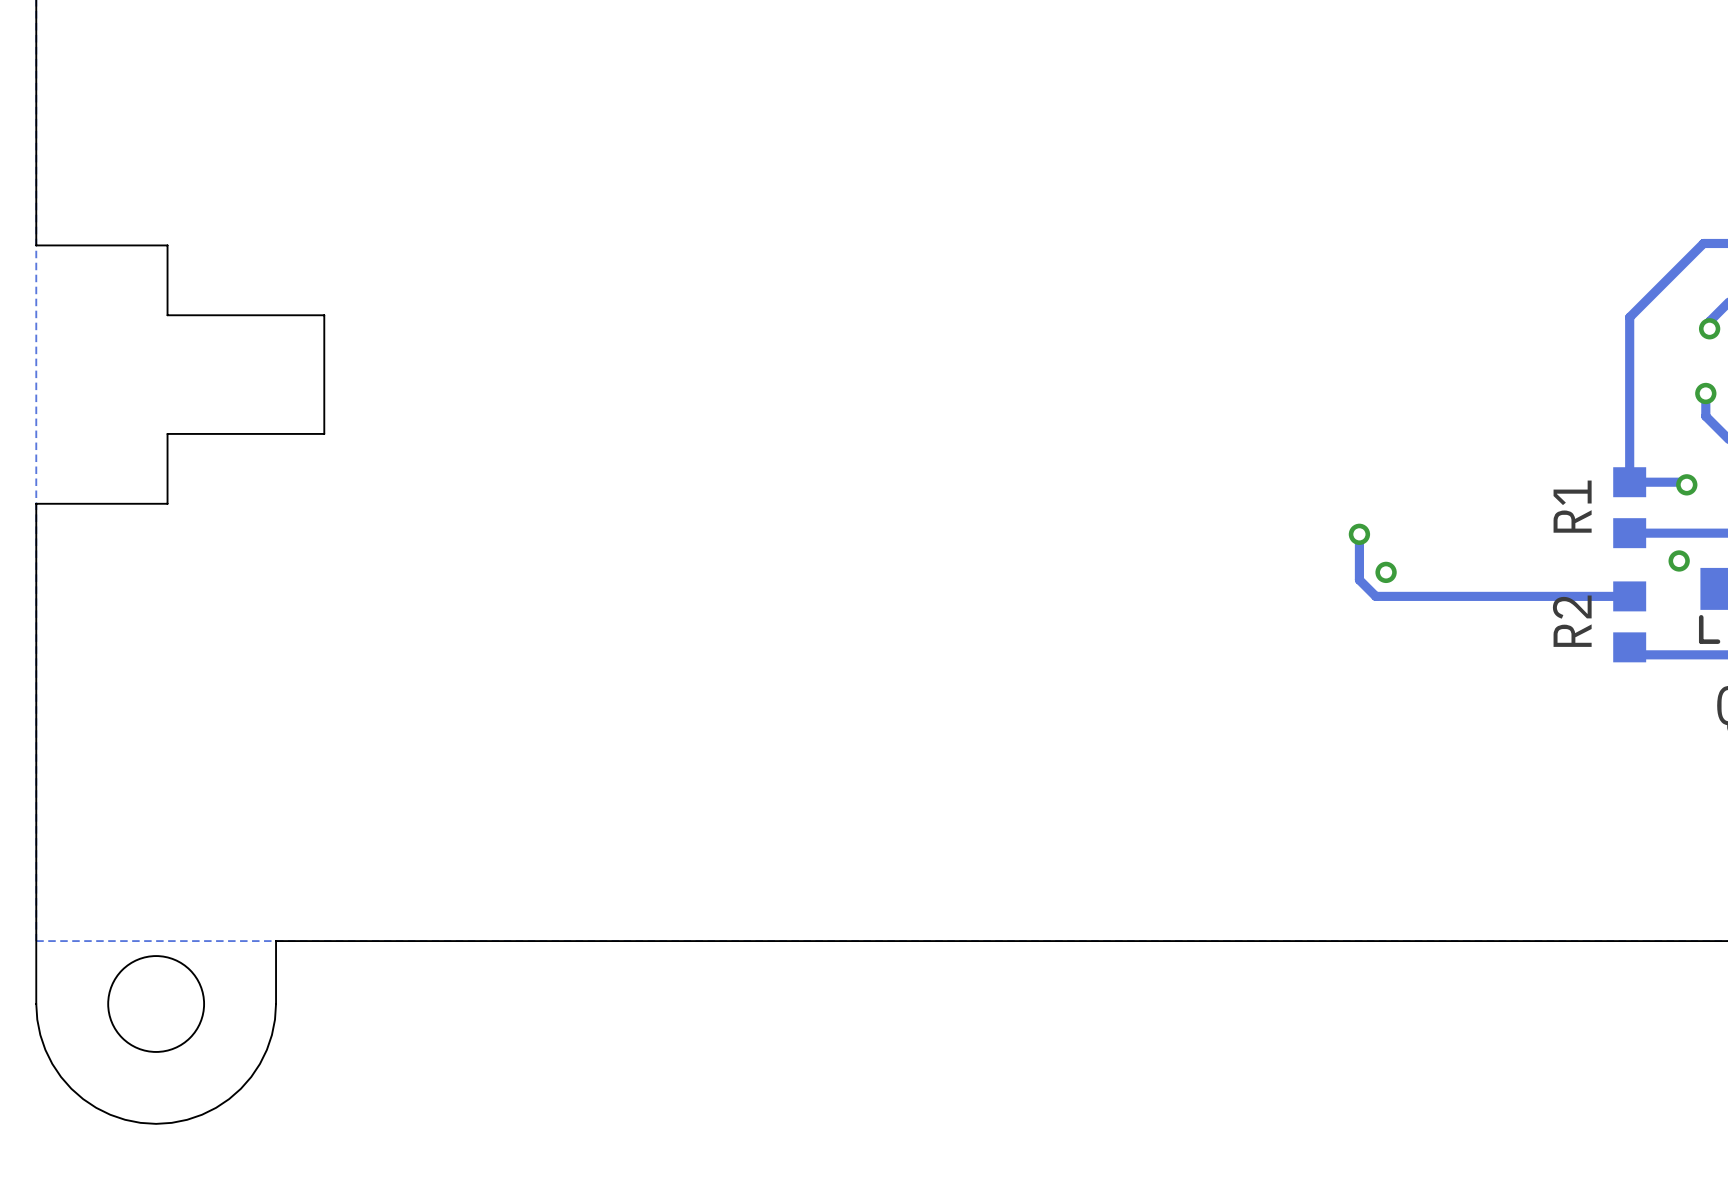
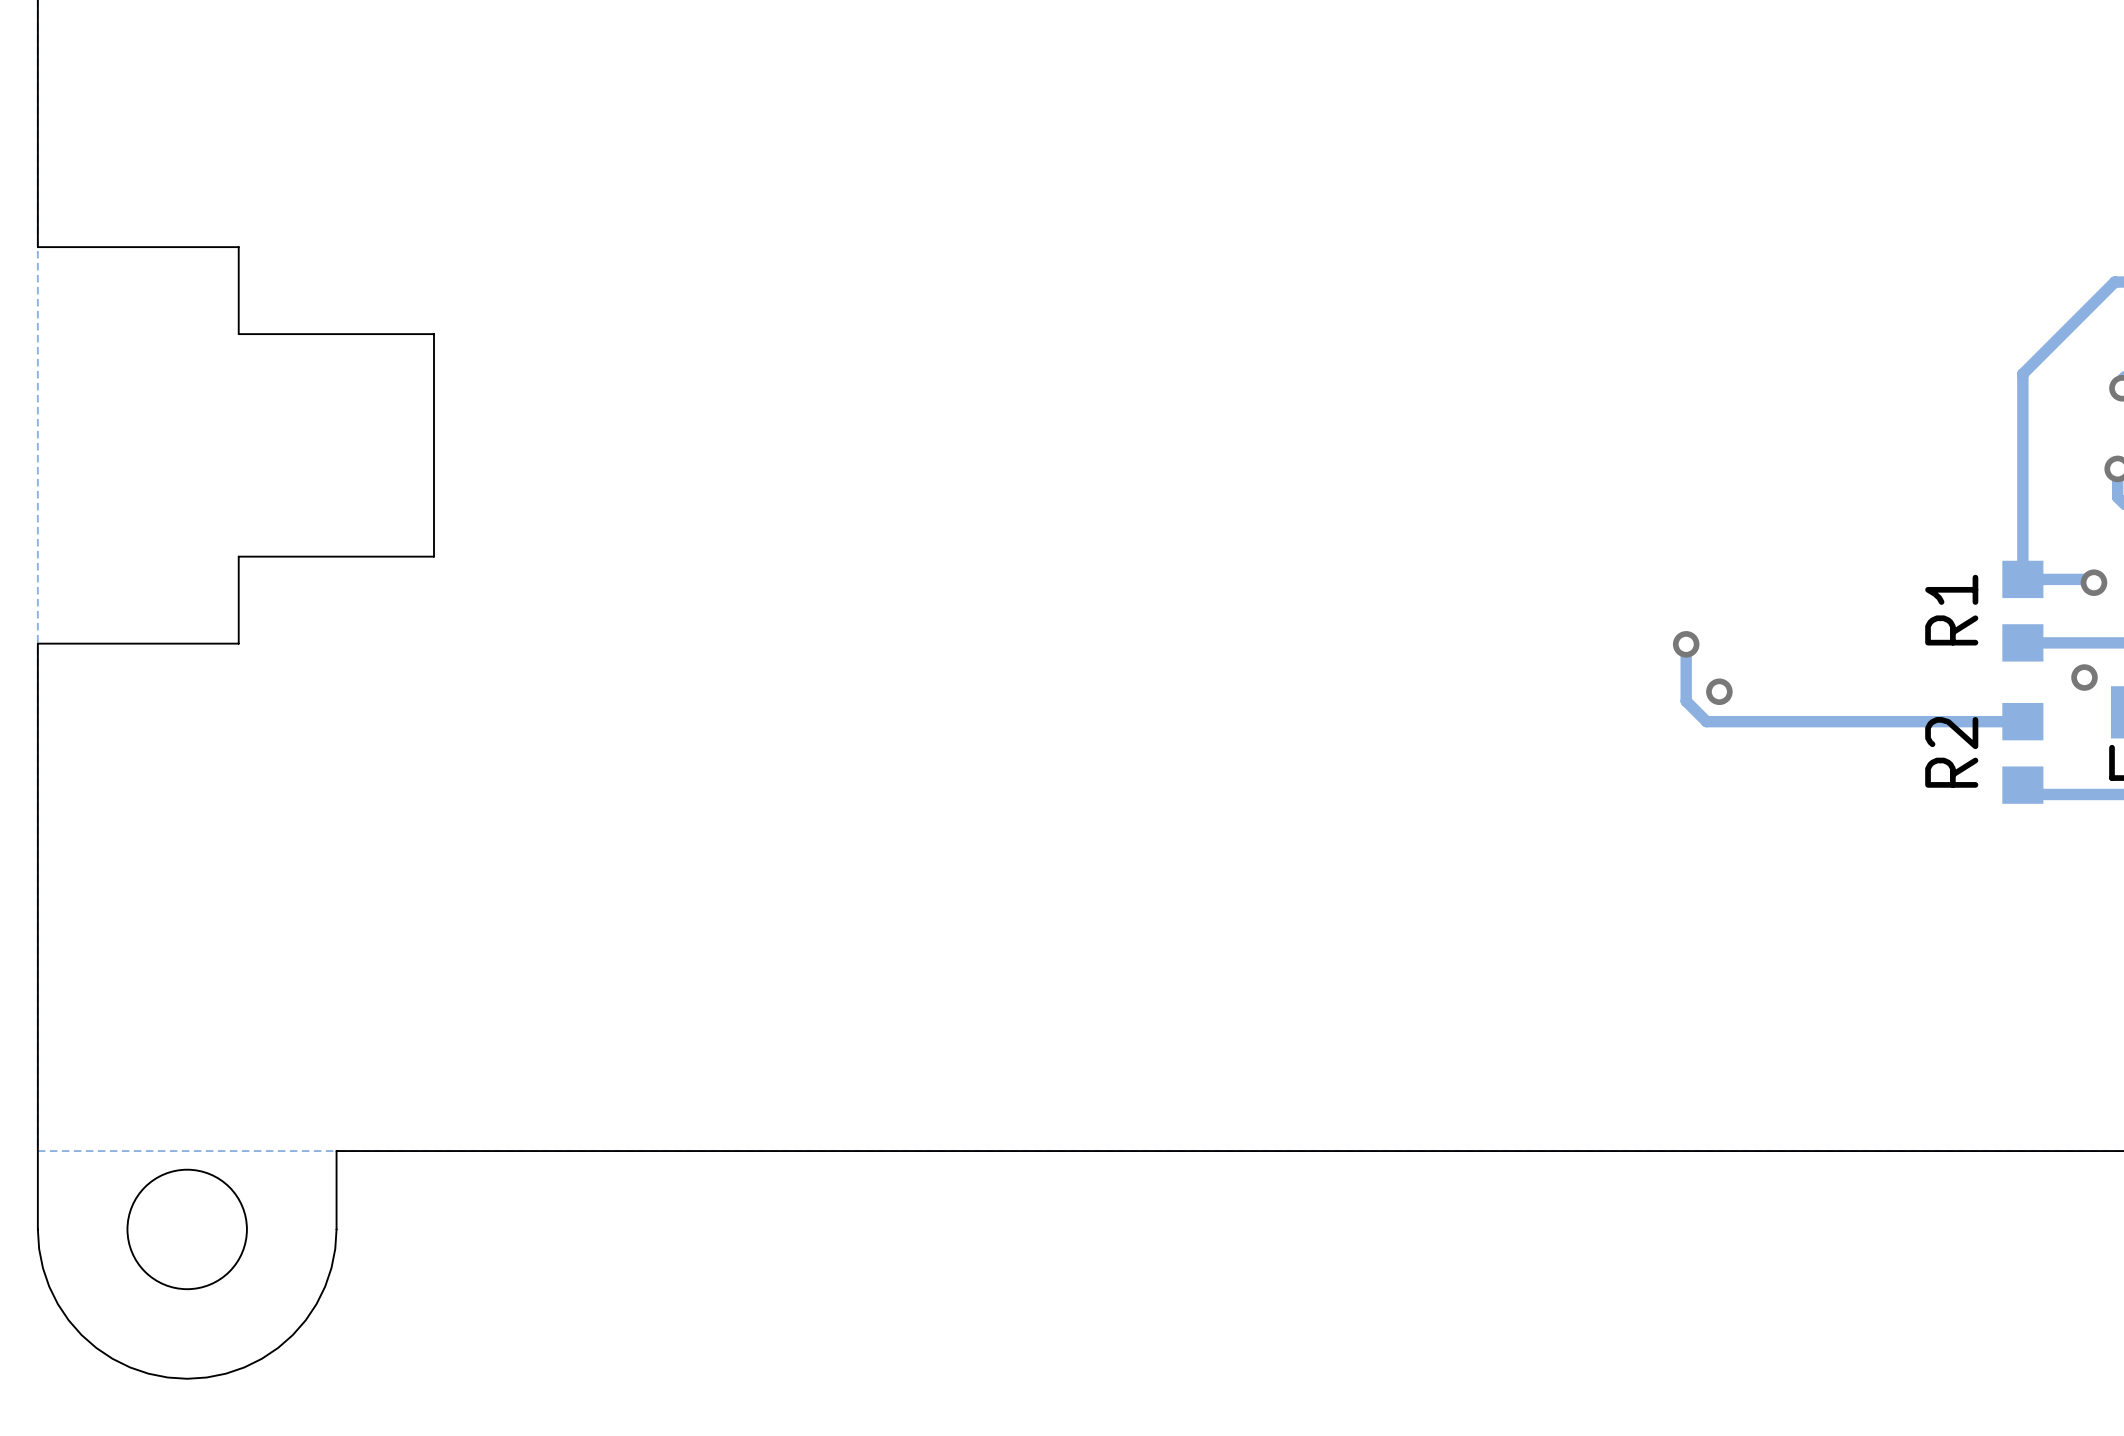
board edge: (36, 215) (36, 245) (167, 245) (167, 315) (324, 315) (324, 433) (167, 433) (167, 503) (36, 503) (36, 533) -> (37, 247) (238, 247) (238, 334) (434, 334) (434, 556) (238, 556) (238, 643) (37, 643)

